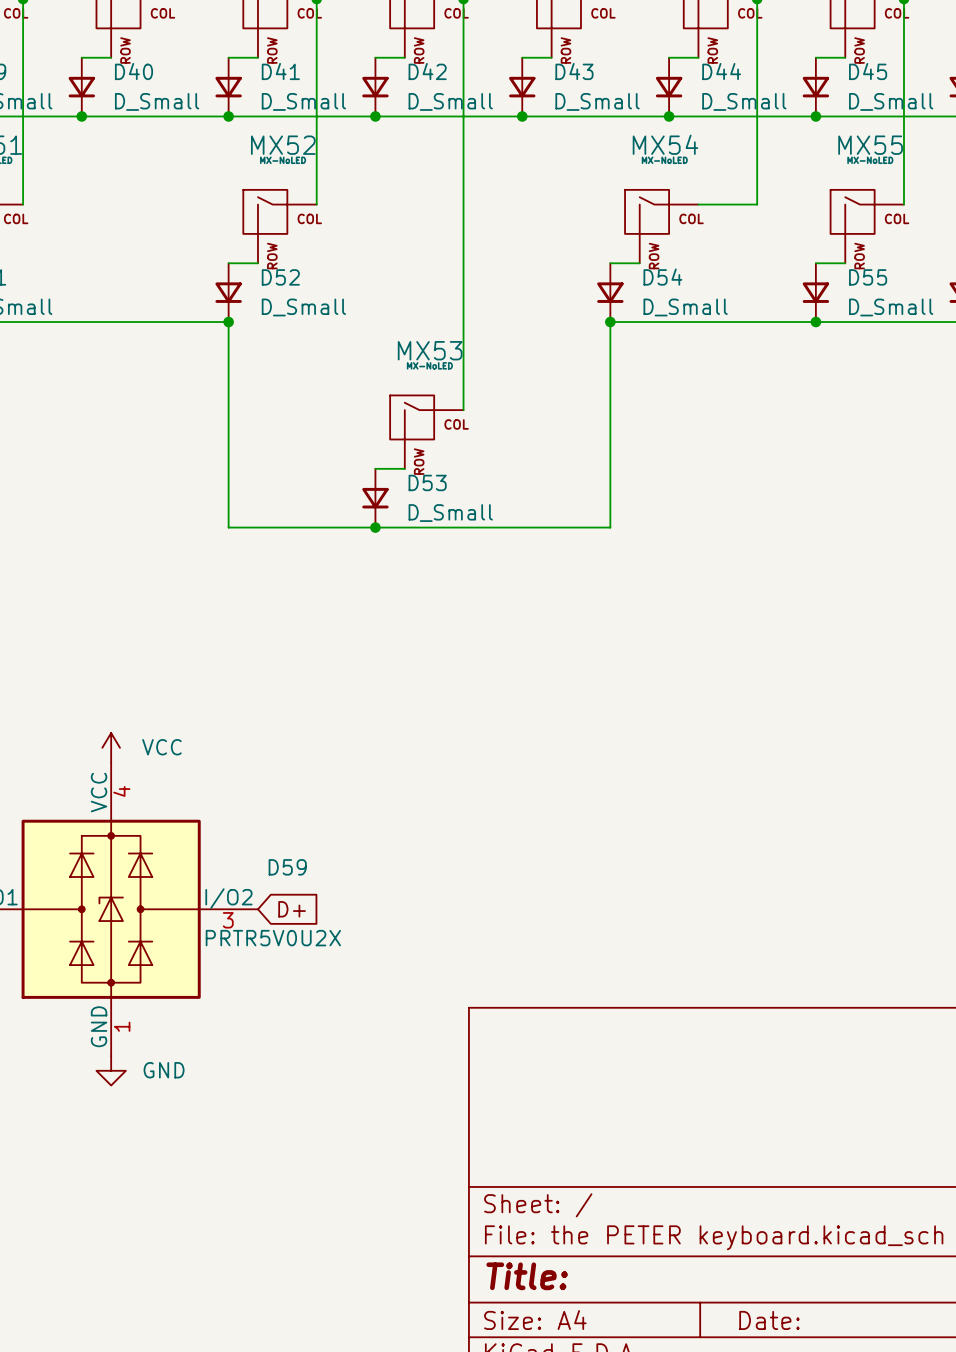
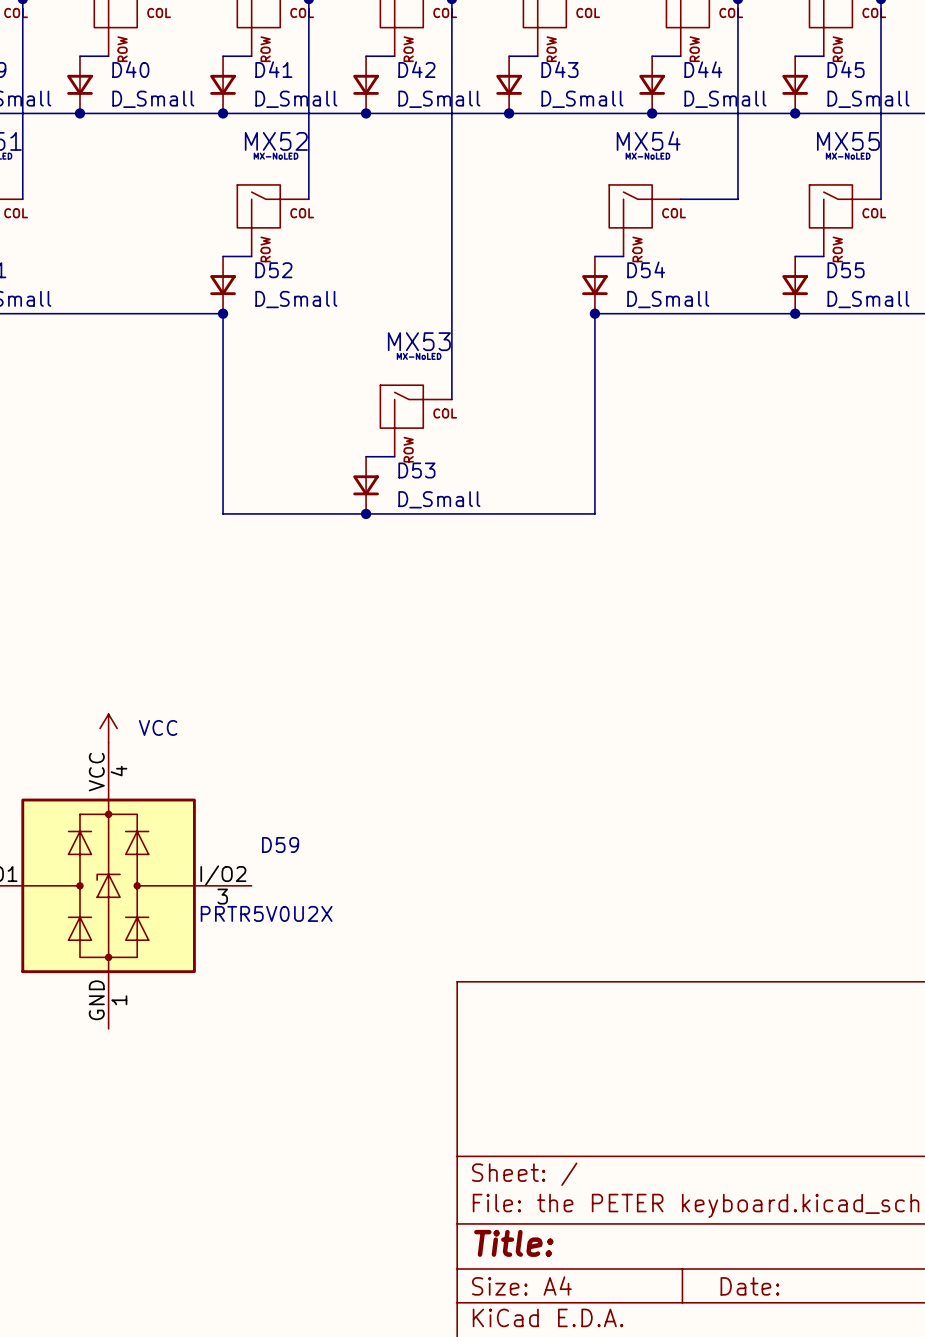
global label: D+ (292, 909) -> none
power symbol: GND (111, 1070) -> none

